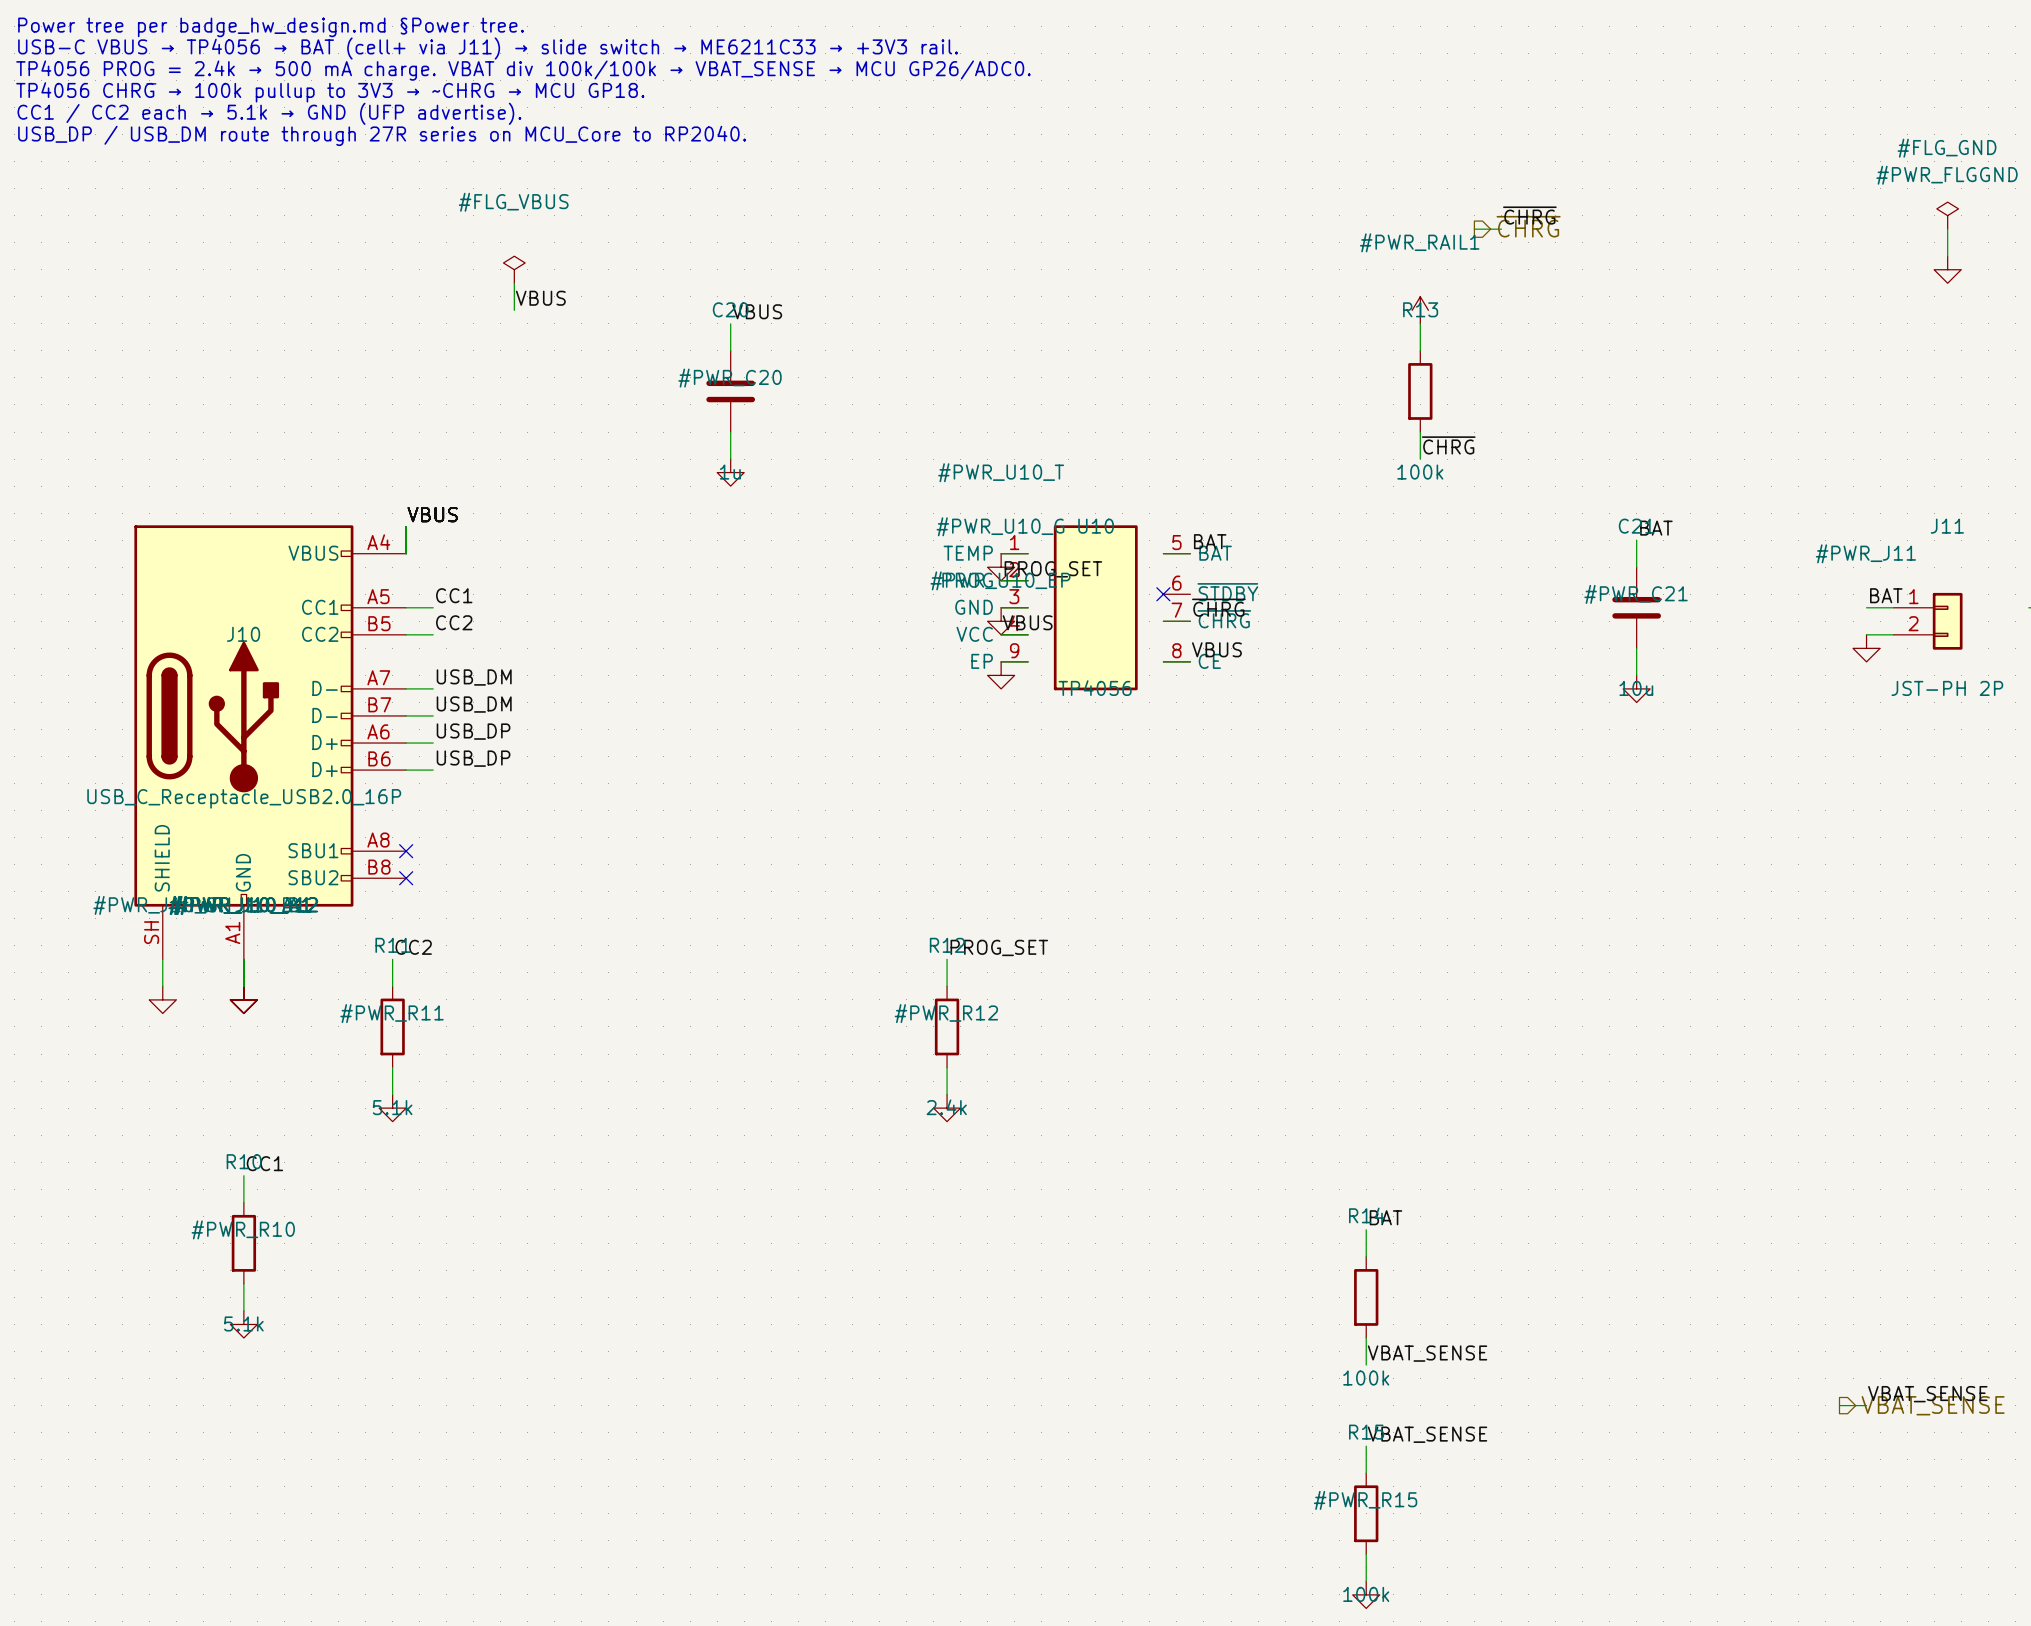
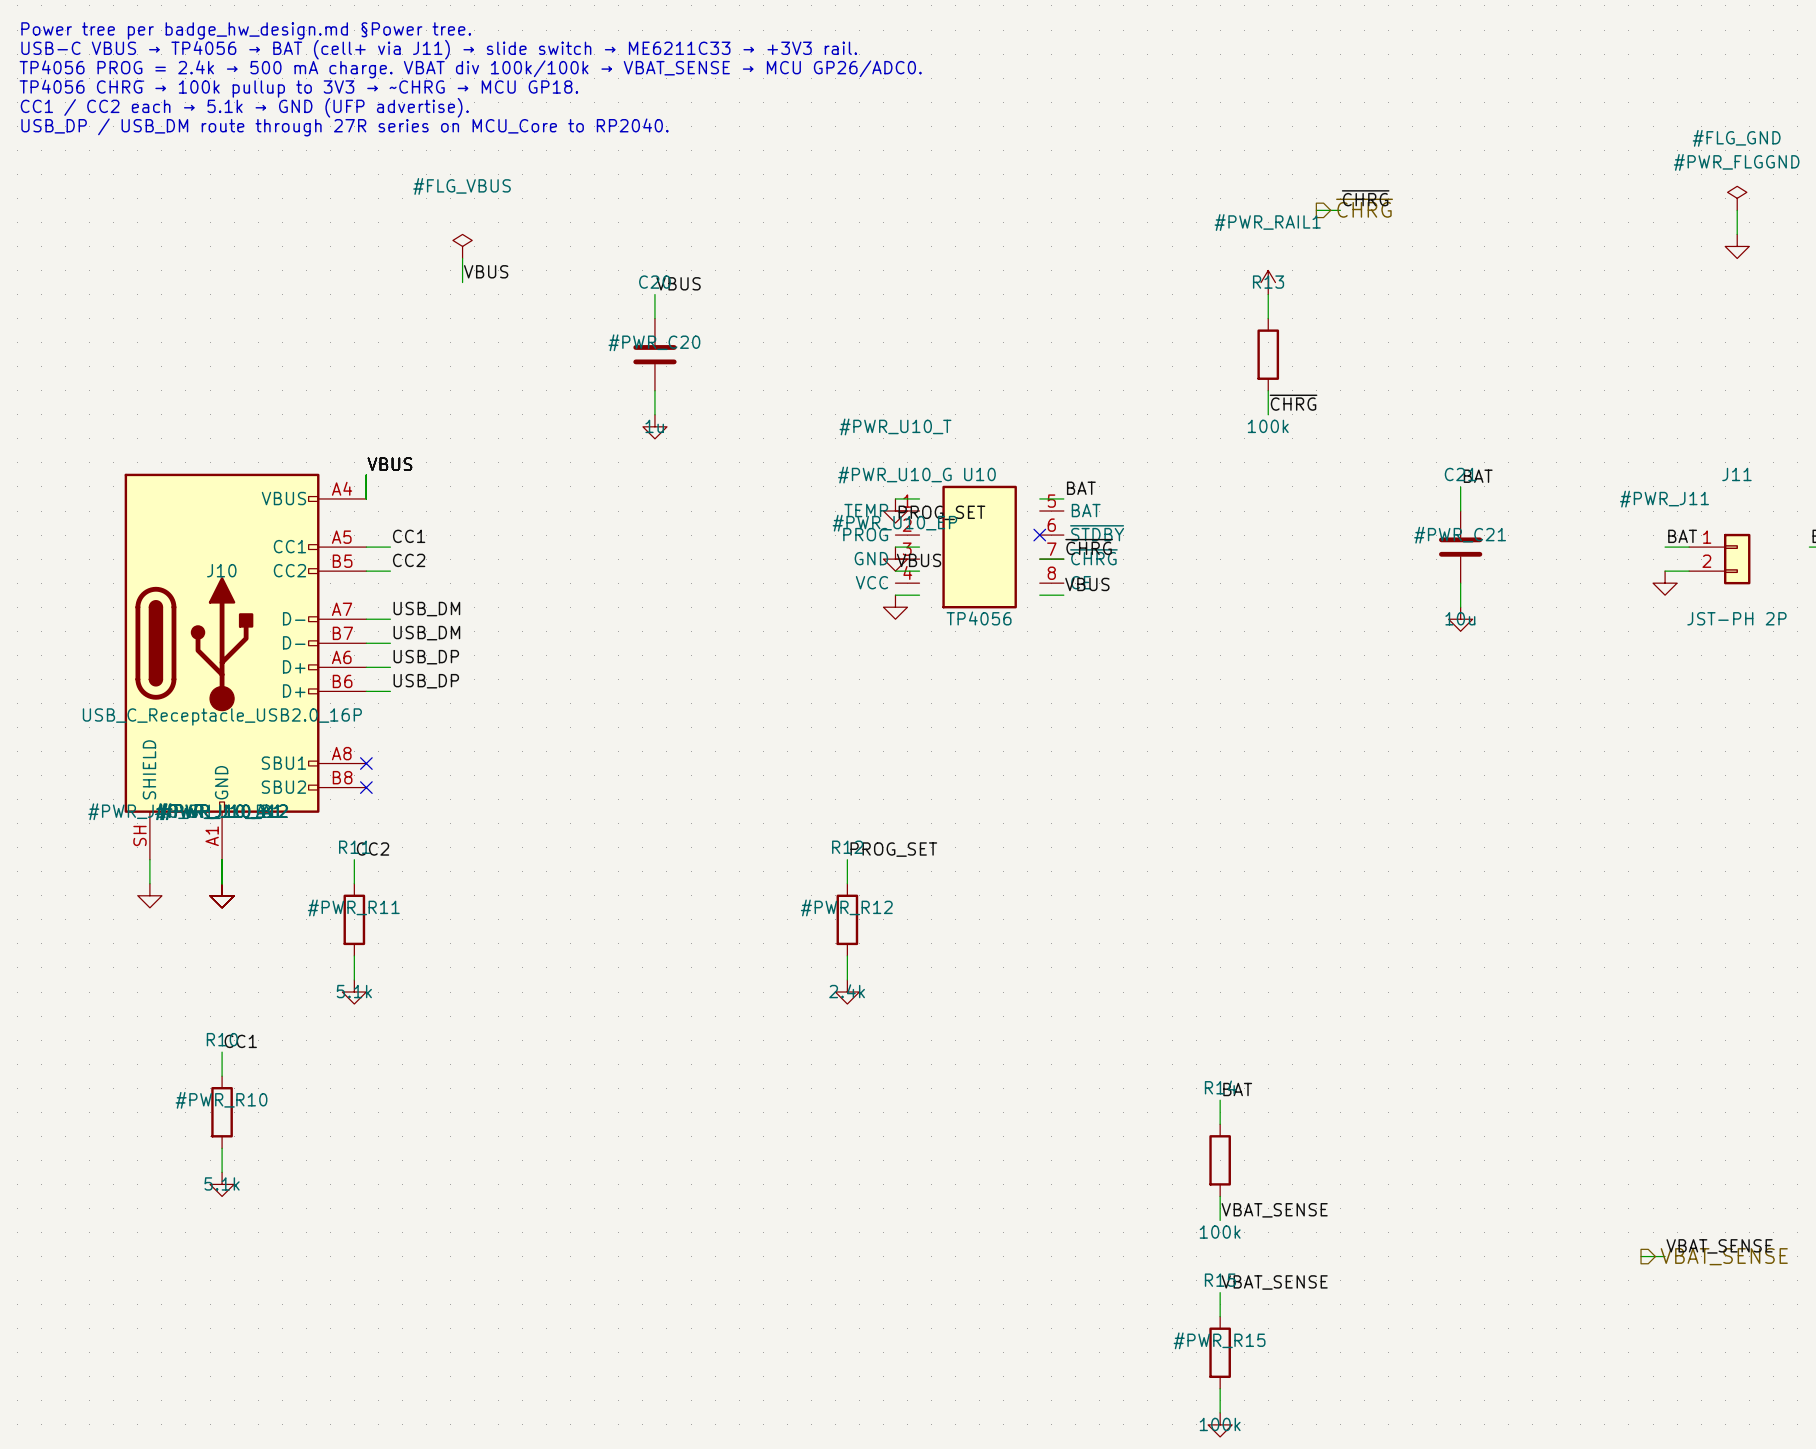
U10 symbol: [1001, 525, 1191, 691] -> [895, 485, 1064, 609]
wire: (1001, 580) (1028, 580) -> none

